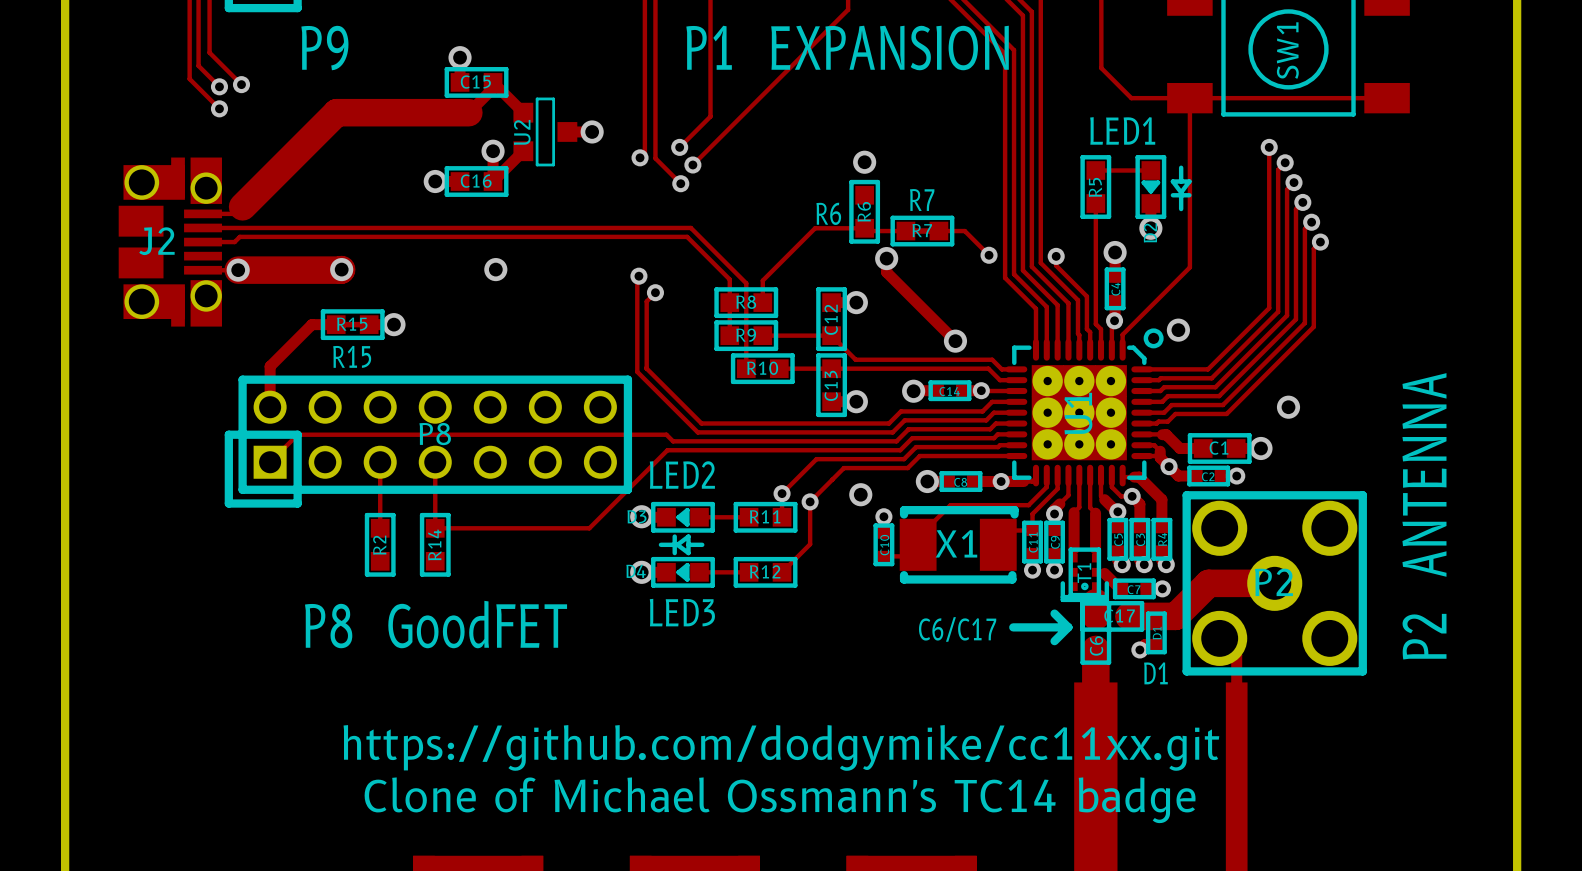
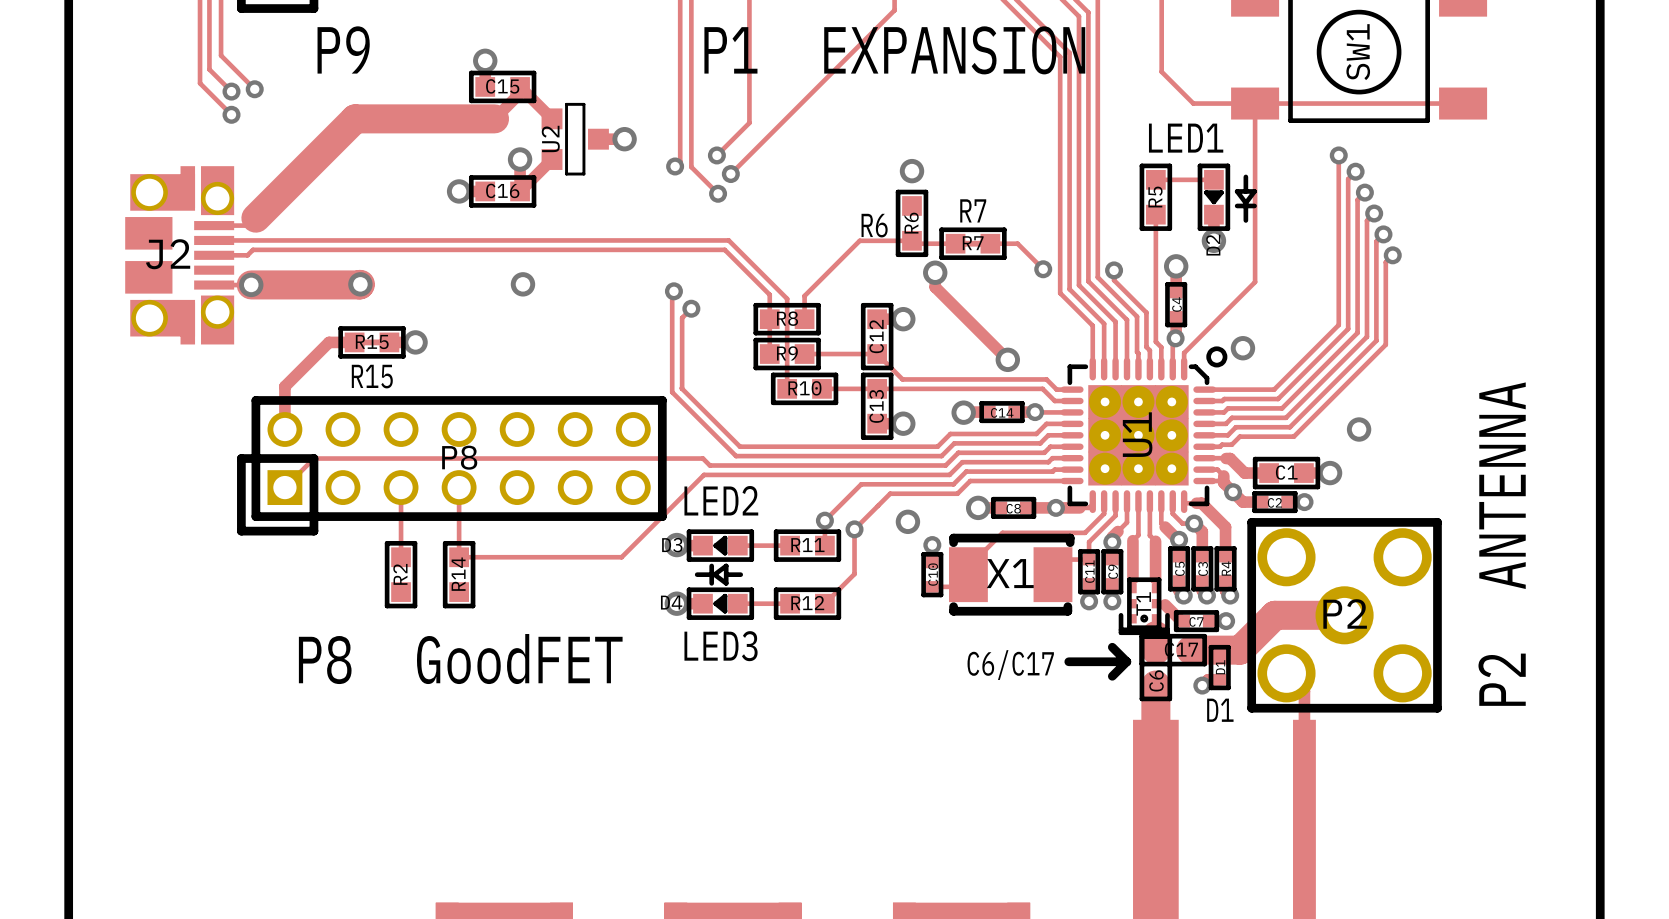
text: https://github.com/dodgymike/cc11xx.git (781, 747) -> none
text: Clone of Michael Ossmann's TC14 badge (780, 800) -> none

